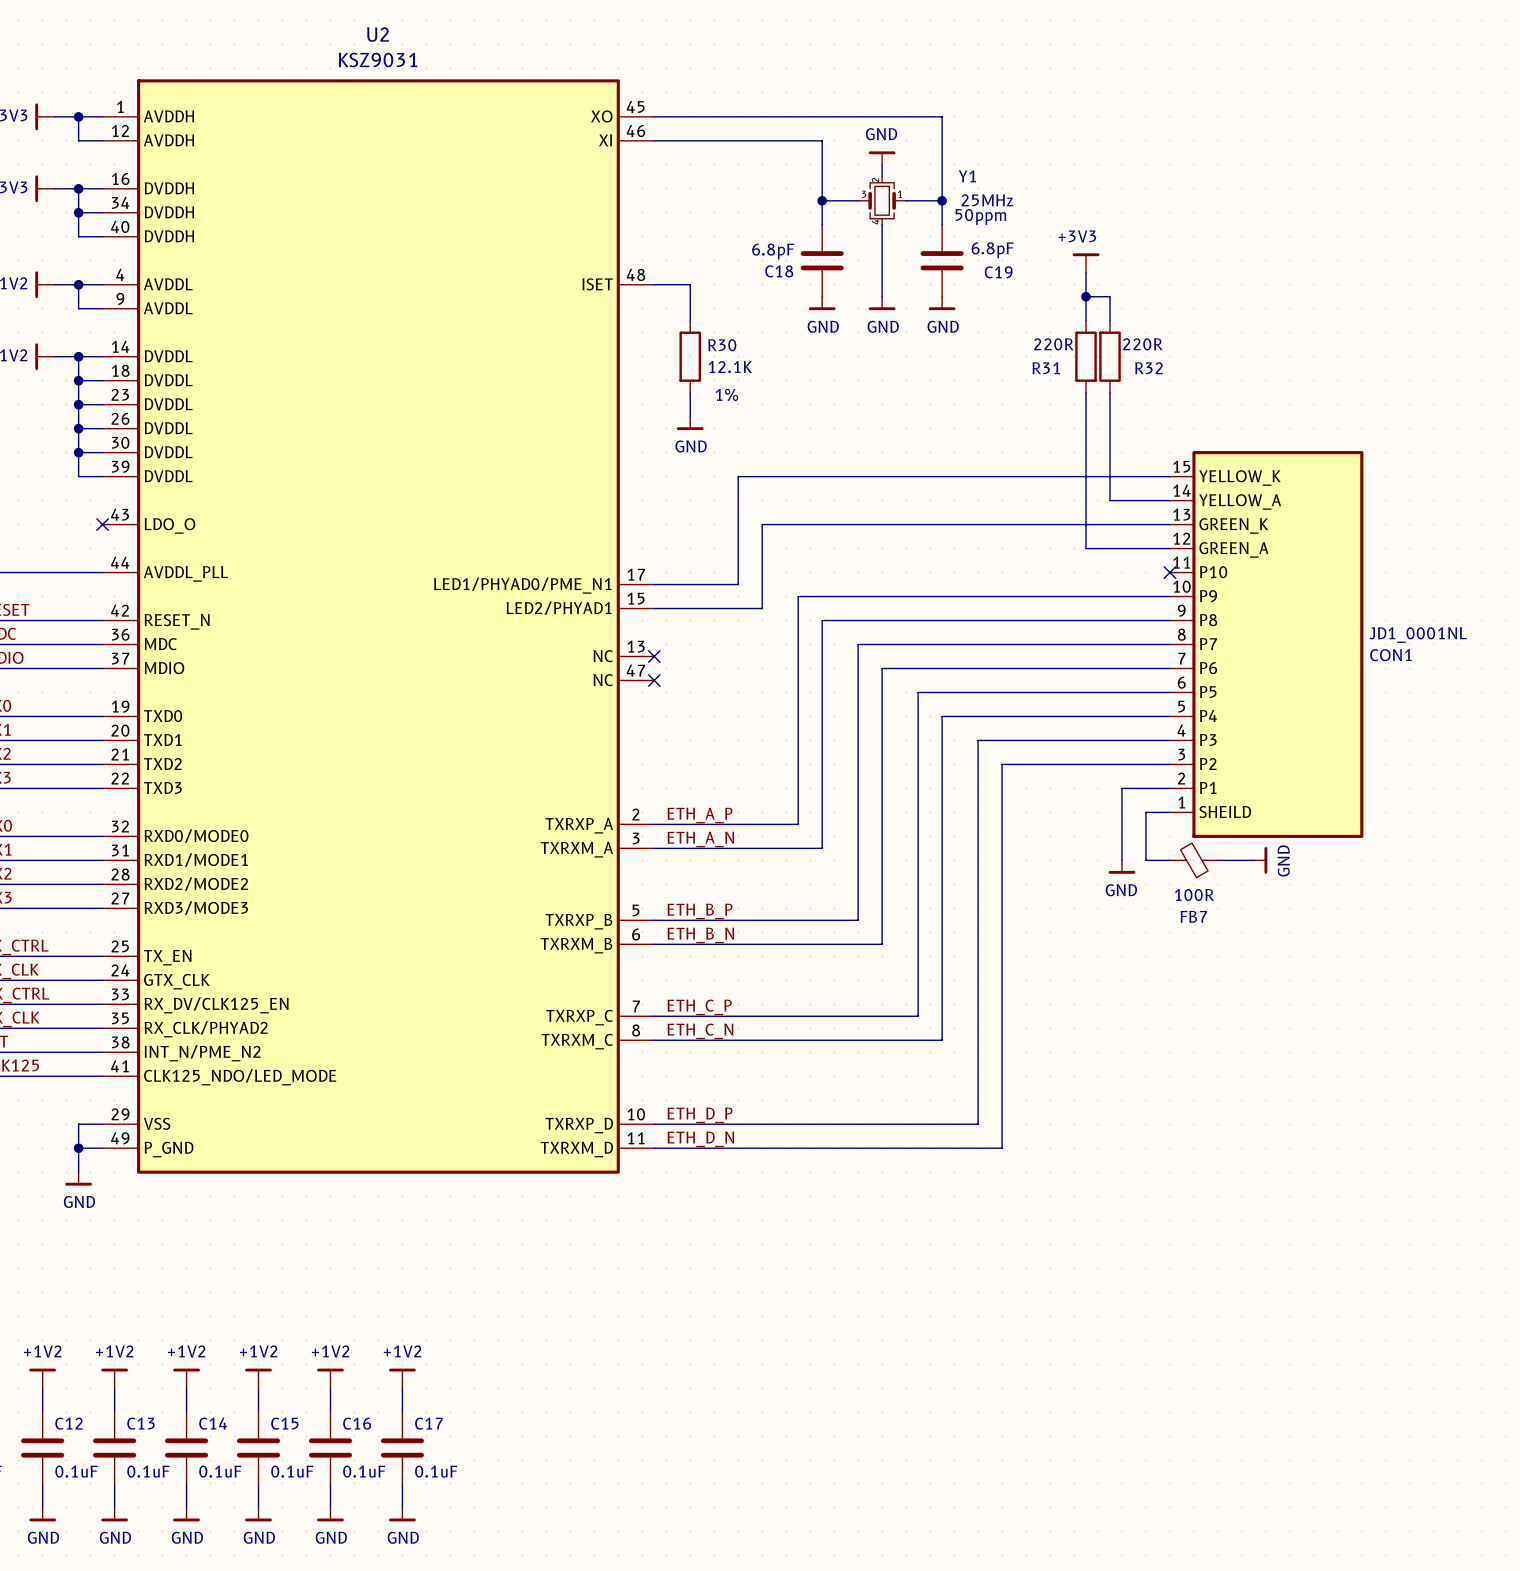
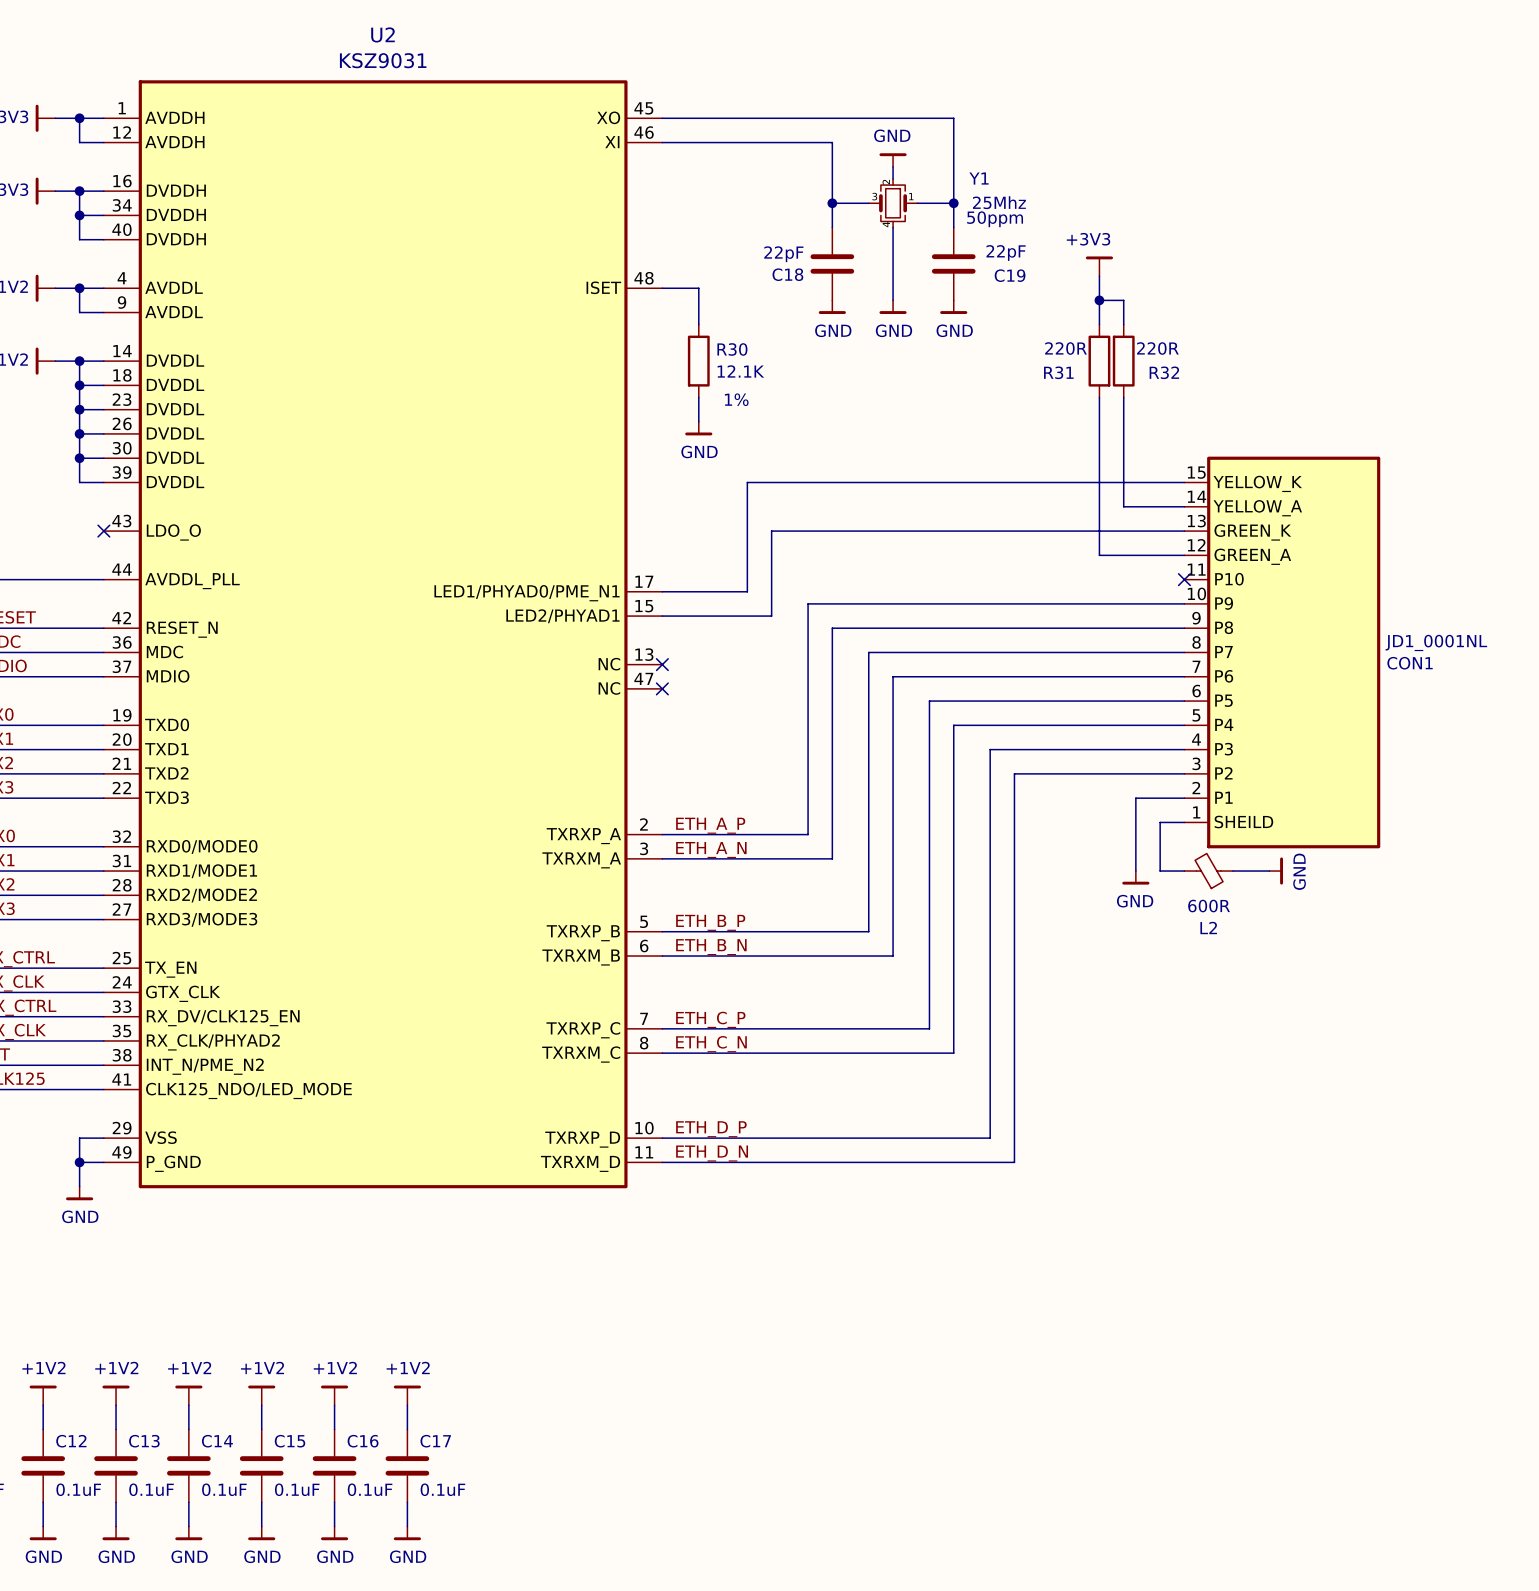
Y1 value: 25MHz (987, 200) -> 25Mhz (999, 202)
C19 value: 6.8pF (992, 250) -> 22pF (1006, 253)
C18 value: 6.8pF (773, 251) -> 22pF (783, 254)
FB7 value: 100R (1194, 895) -> 600R (1209, 906)
FB7 name: FB7 (1193, 916) -> L2 (1208, 928)

